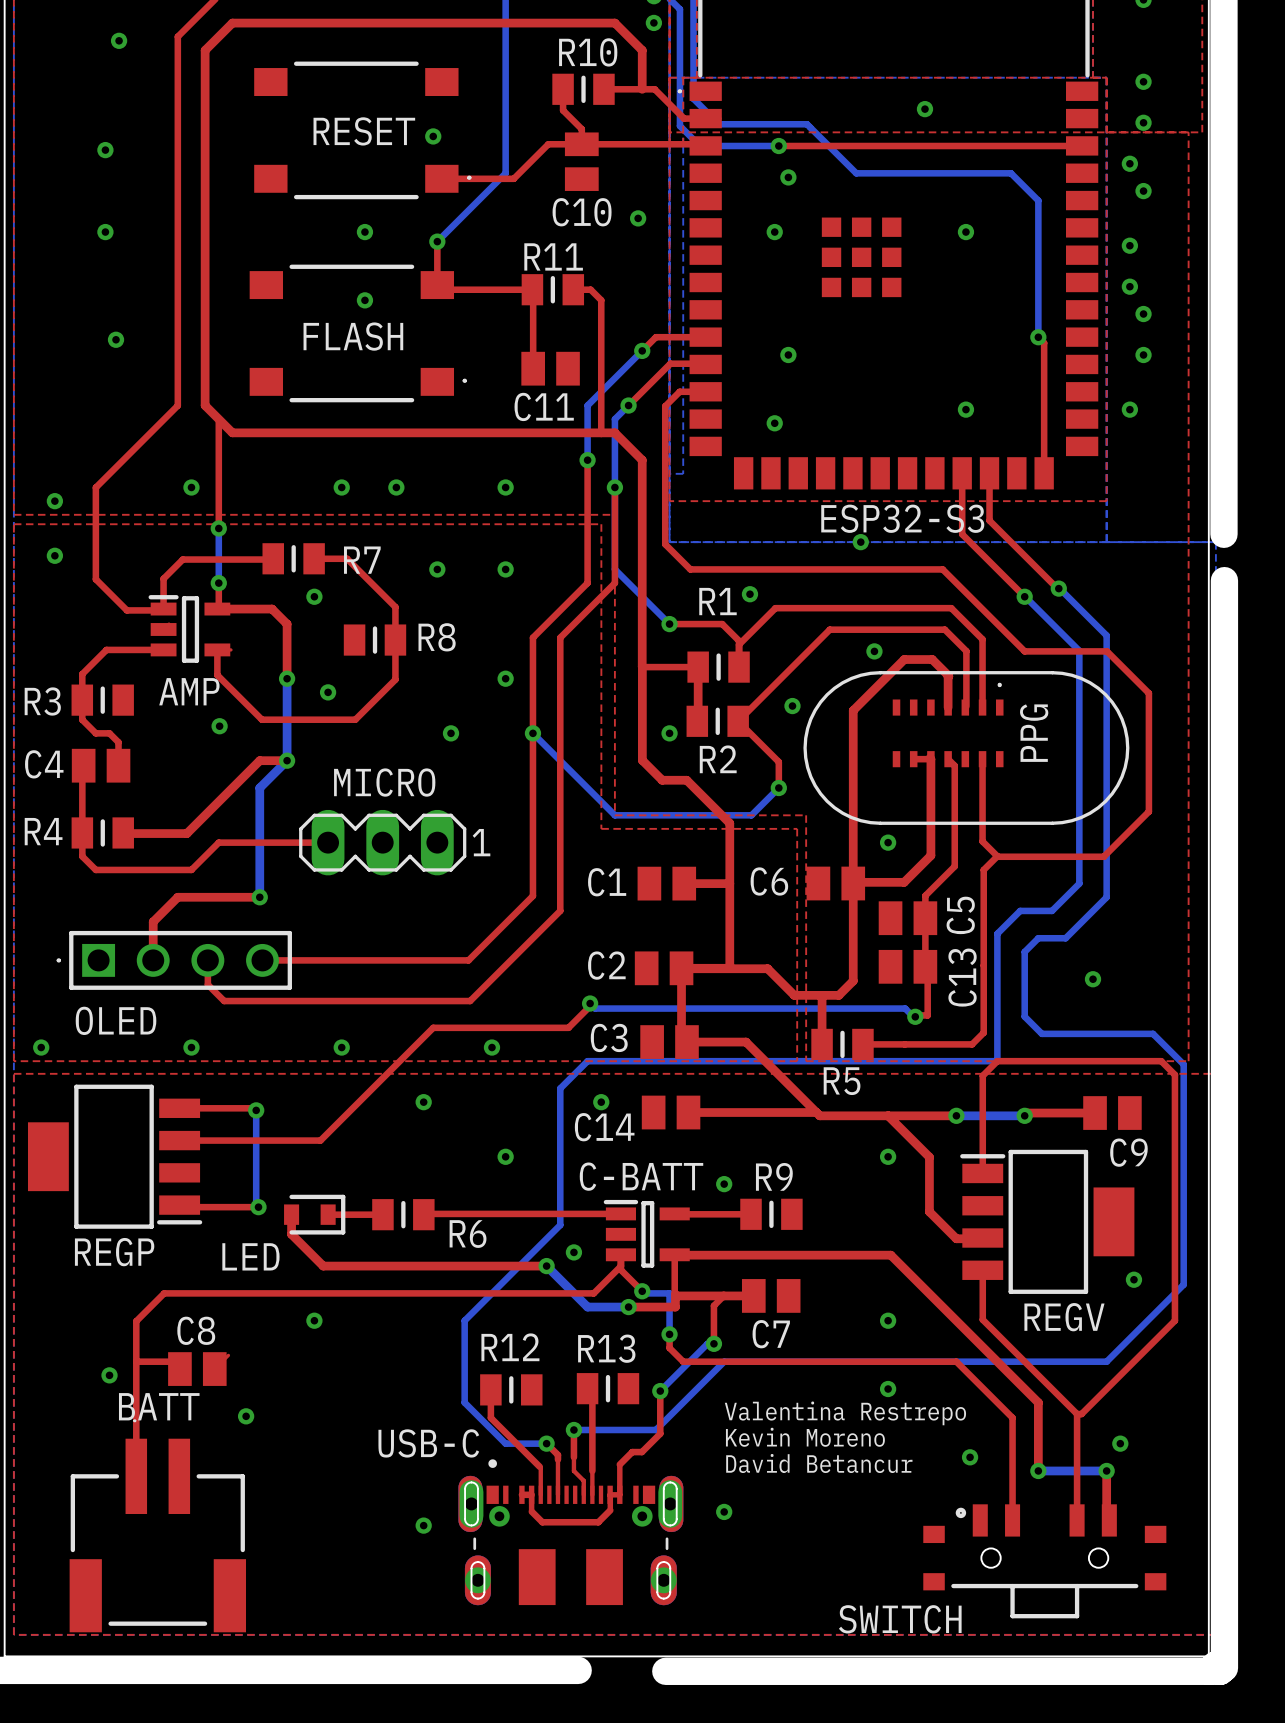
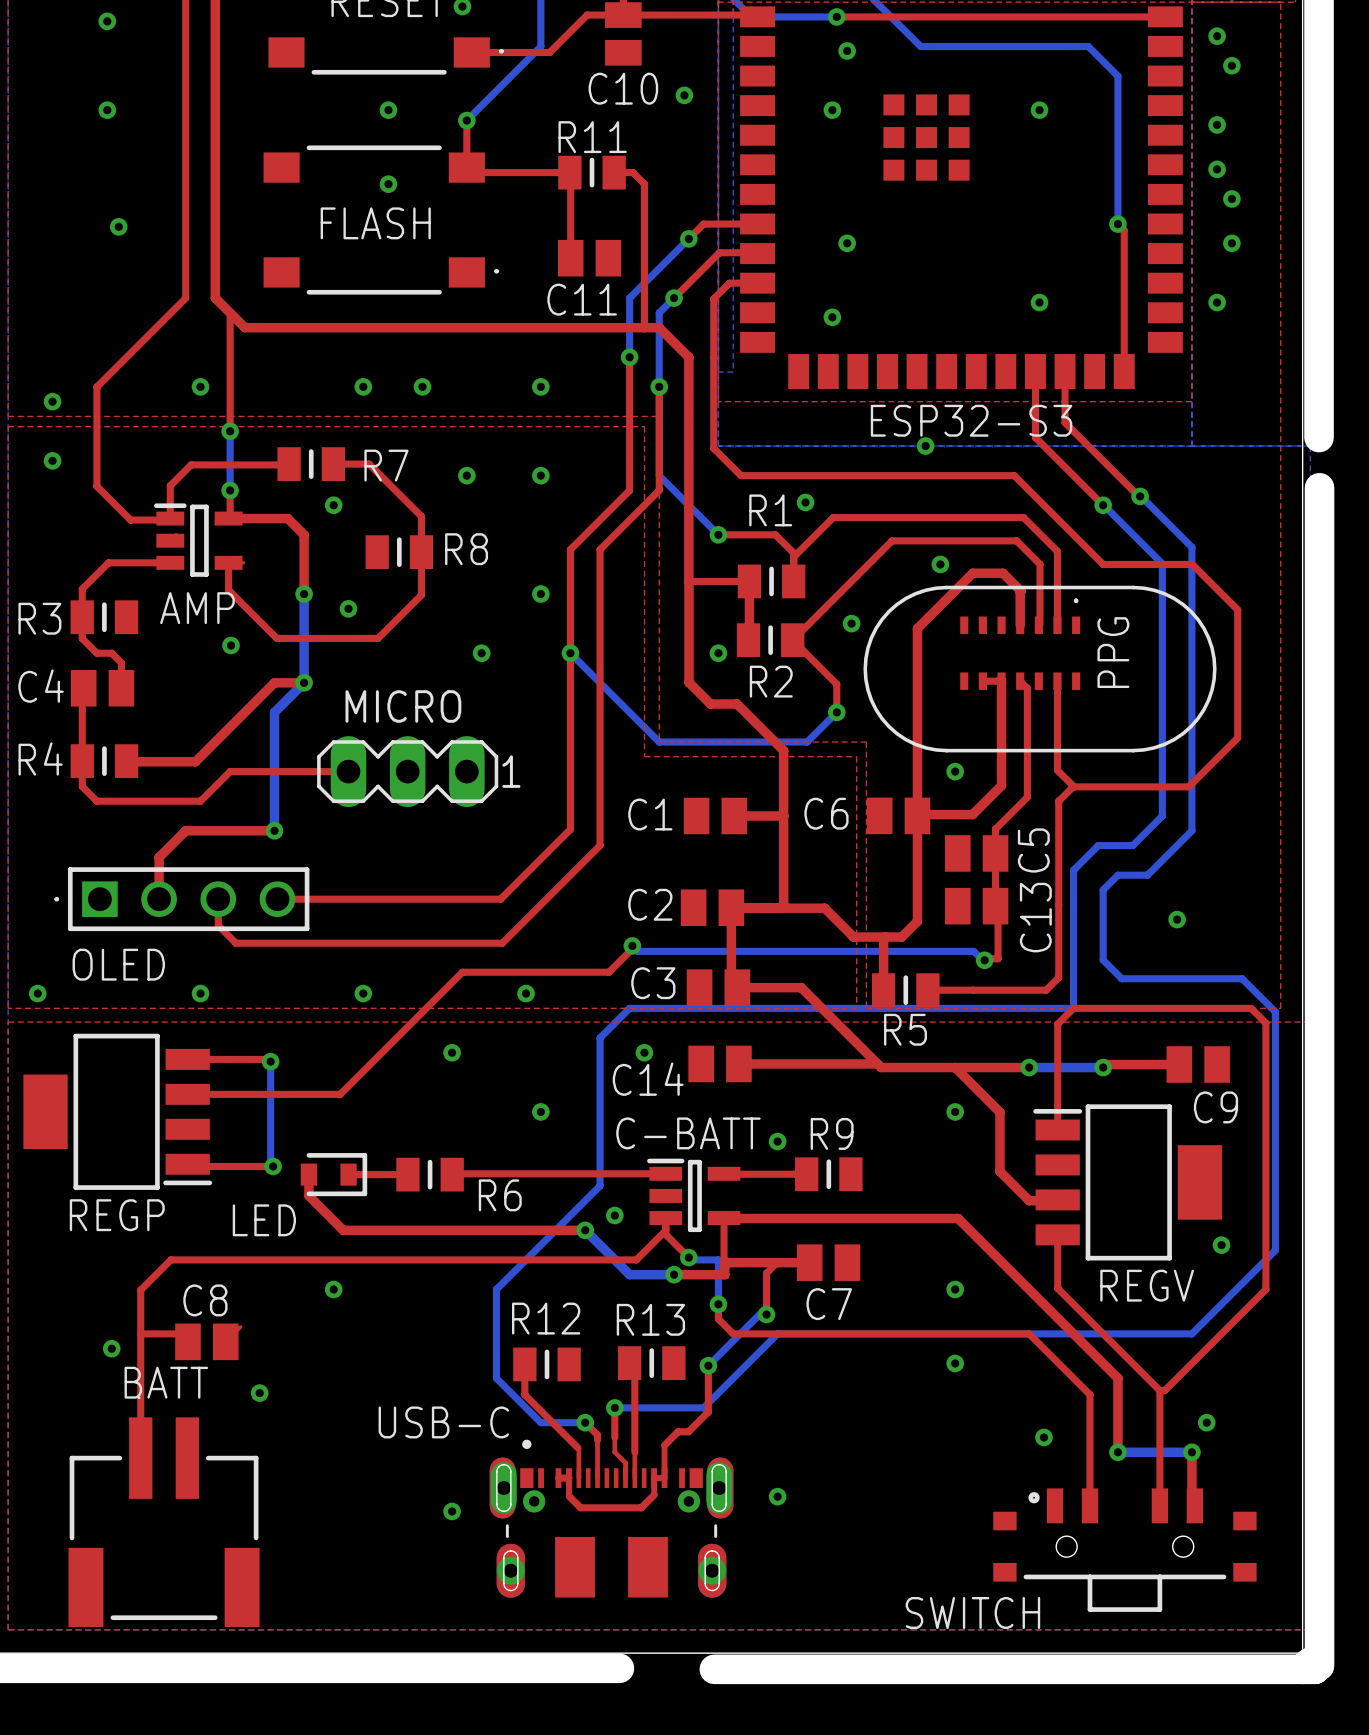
text: Valentina Restrepo (845, 1413) -> none
text: Kevin Moreno (805, 1437) -> none
text: David Betancur (819, 1463) -> none

